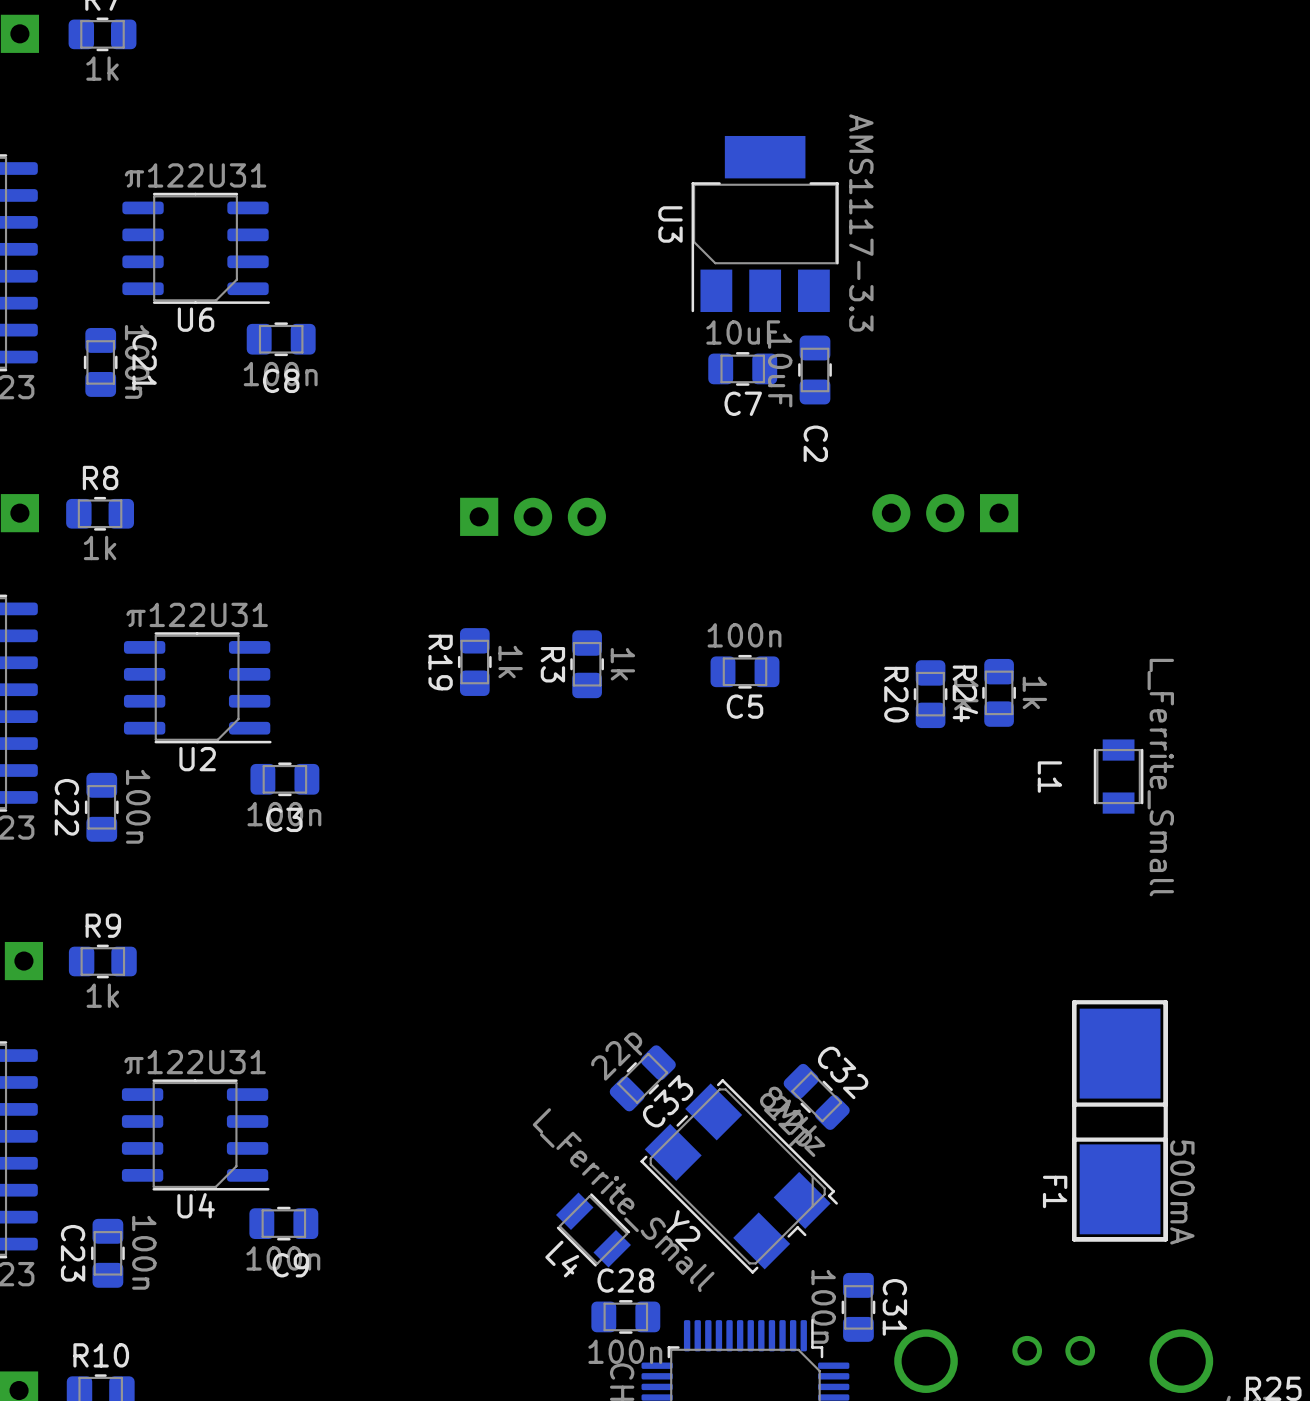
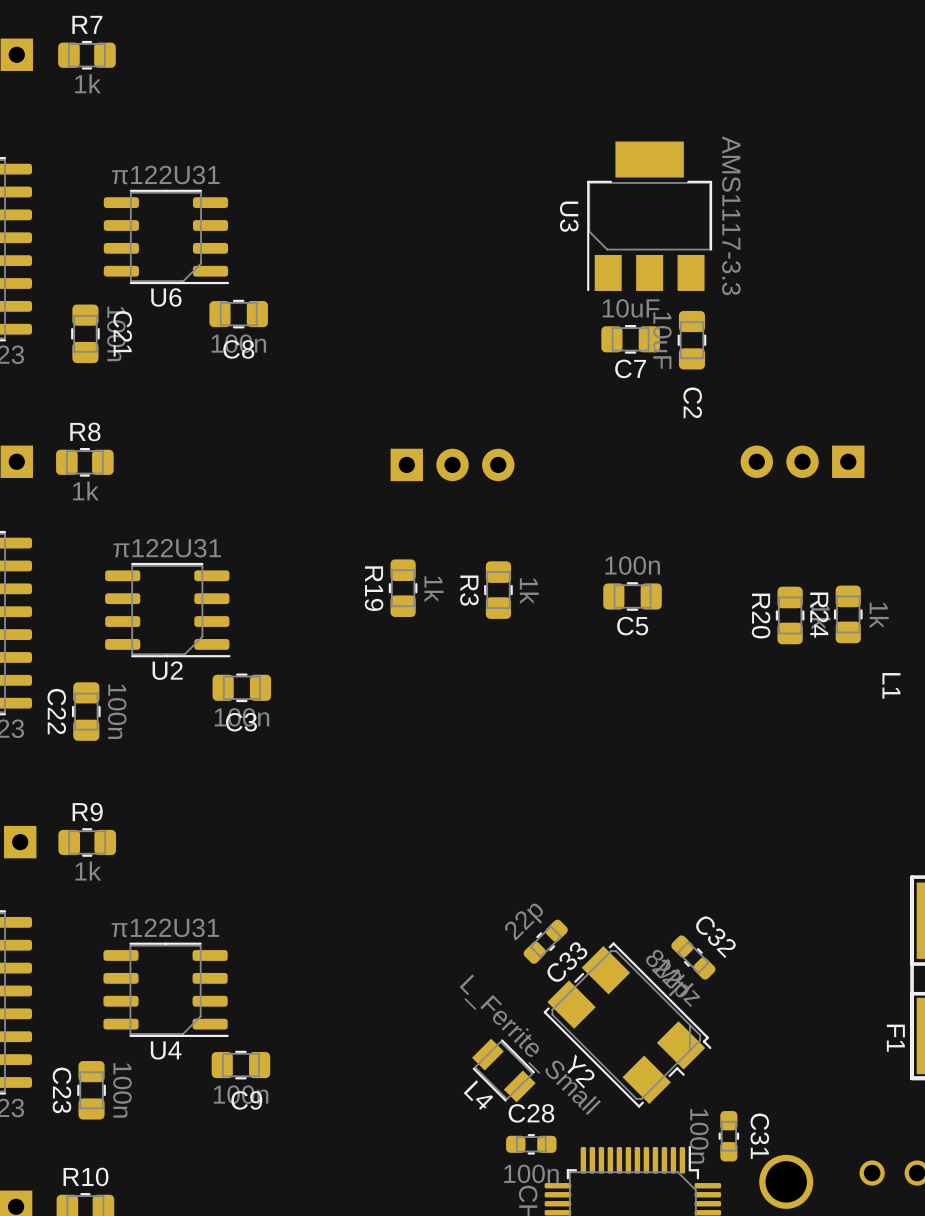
C33 footprint: [609, 1045, 676, 1112] -> [523, 919, 568, 964]
C32 footprint: [783, 1063, 850, 1130] -> [671, 935, 716, 980]
C31 footprint: [841, 1272, 876, 1342] -> [718, 1111, 740, 1162]
C28 footprint: [591, 1300, 661, 1334] -> [506, 1134, 557, 1155]

